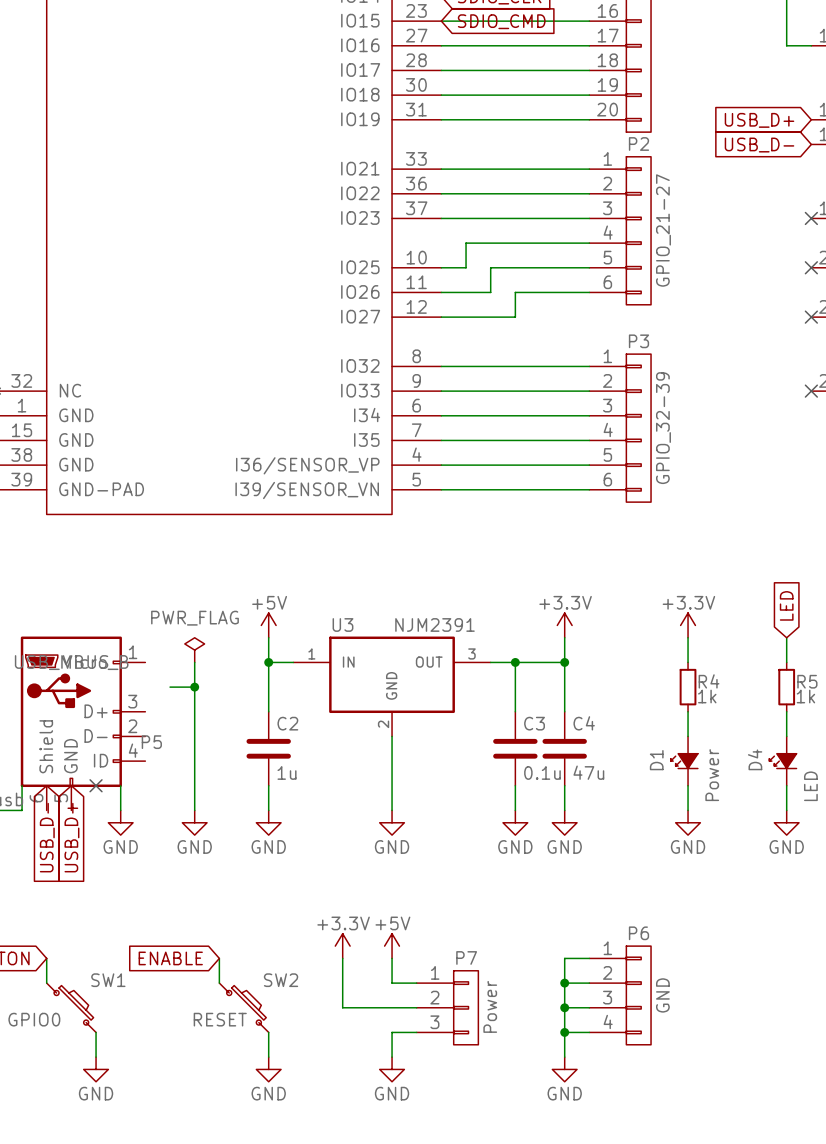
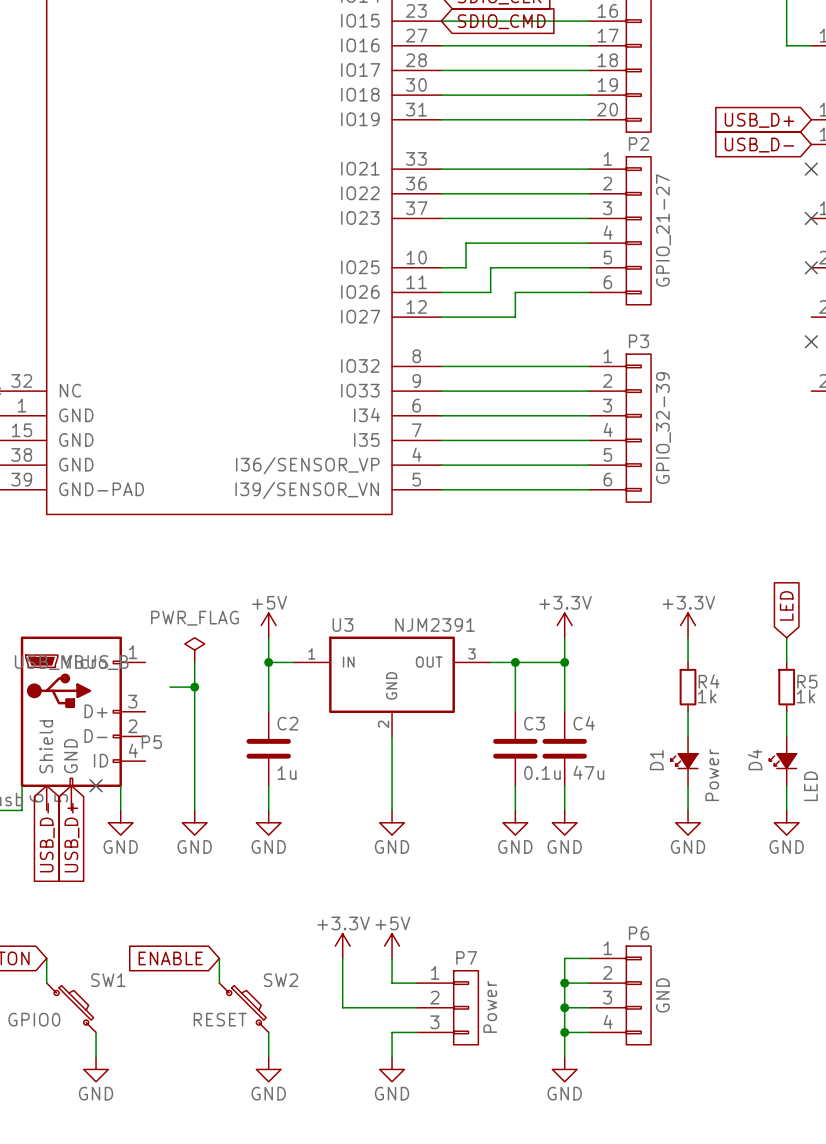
no-connect mark: none -> (811, 169)
no-connect mark: (811, 317) -> none
no-connect mark: none -> (811, 341)
no-connect mark: (811, 391) -> none

